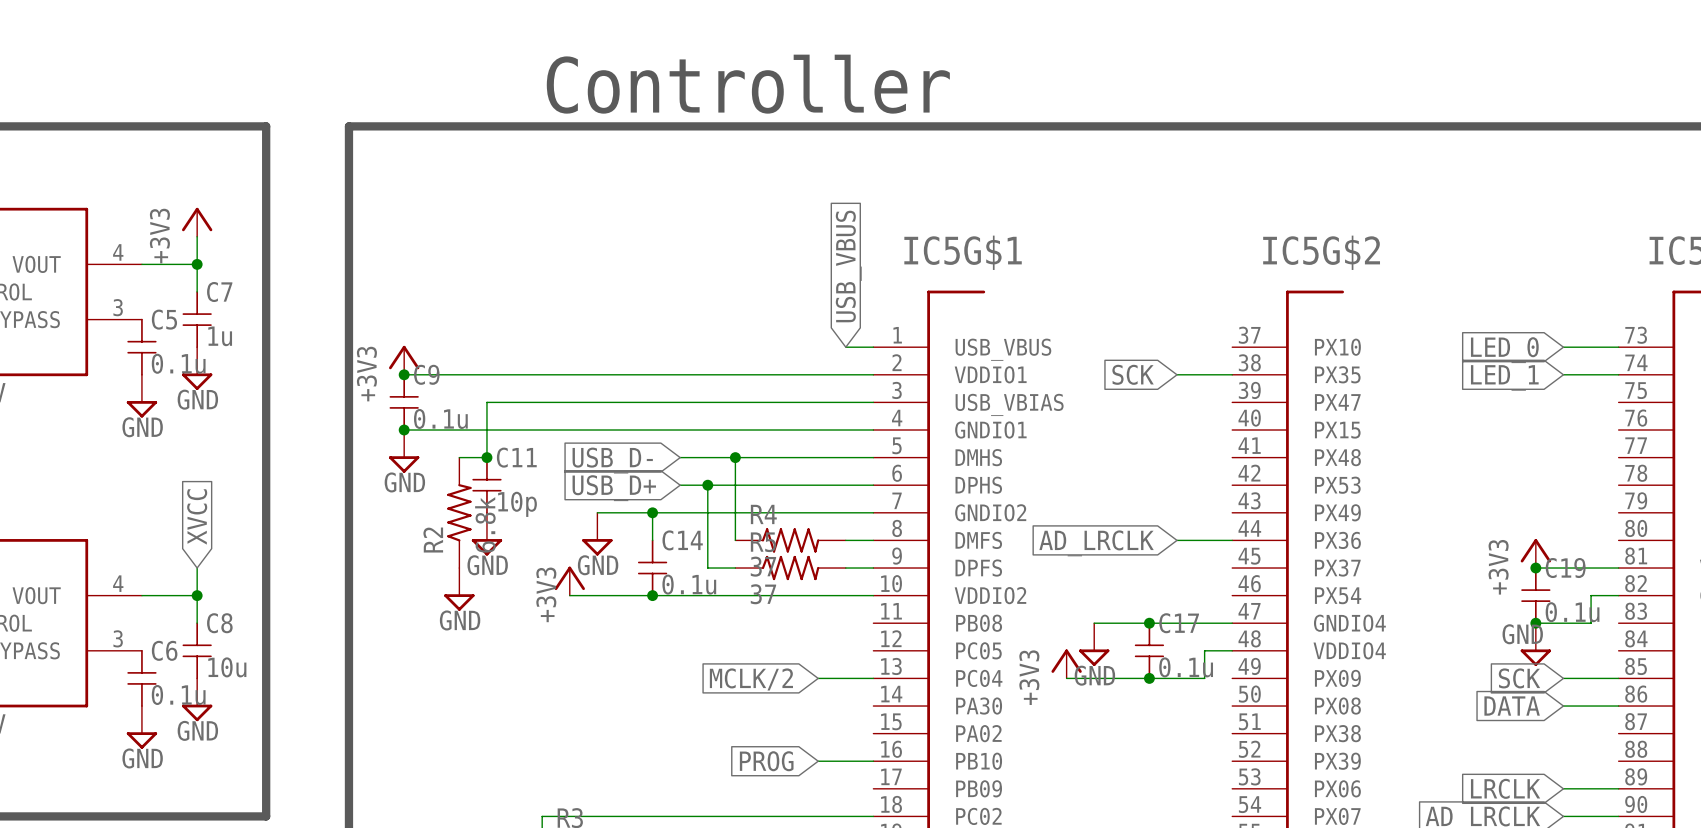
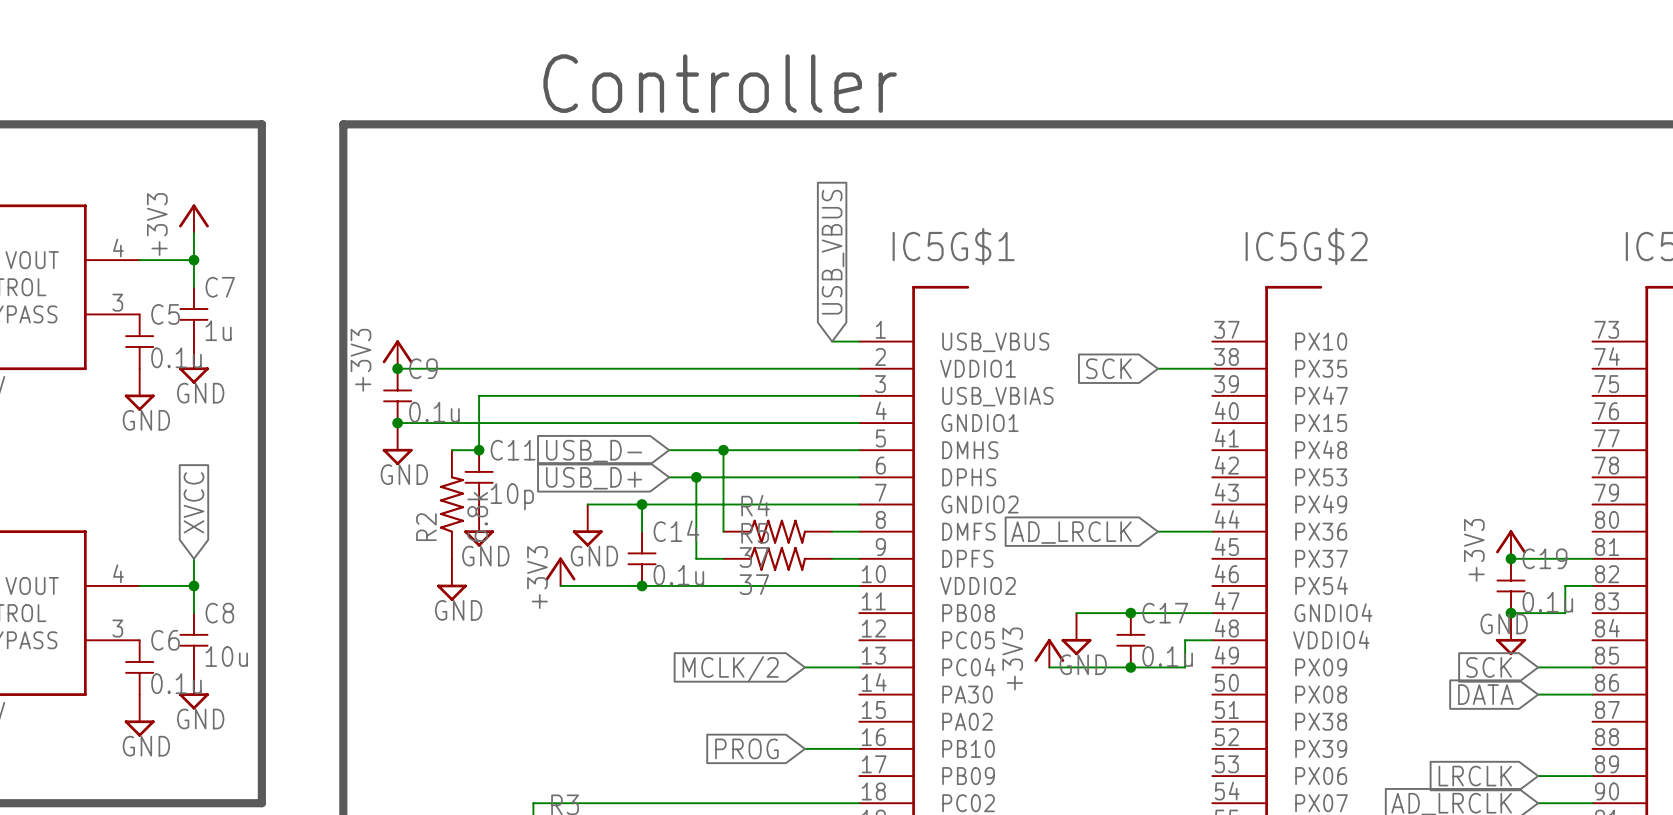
wire: (1563, 347) (1618, 347) -> none
global label: LED_0 (1504, 350) -> none
wire: (1563, 374) (1618, 374) -> none
global label: LED_1 (1504, 377) -> none

